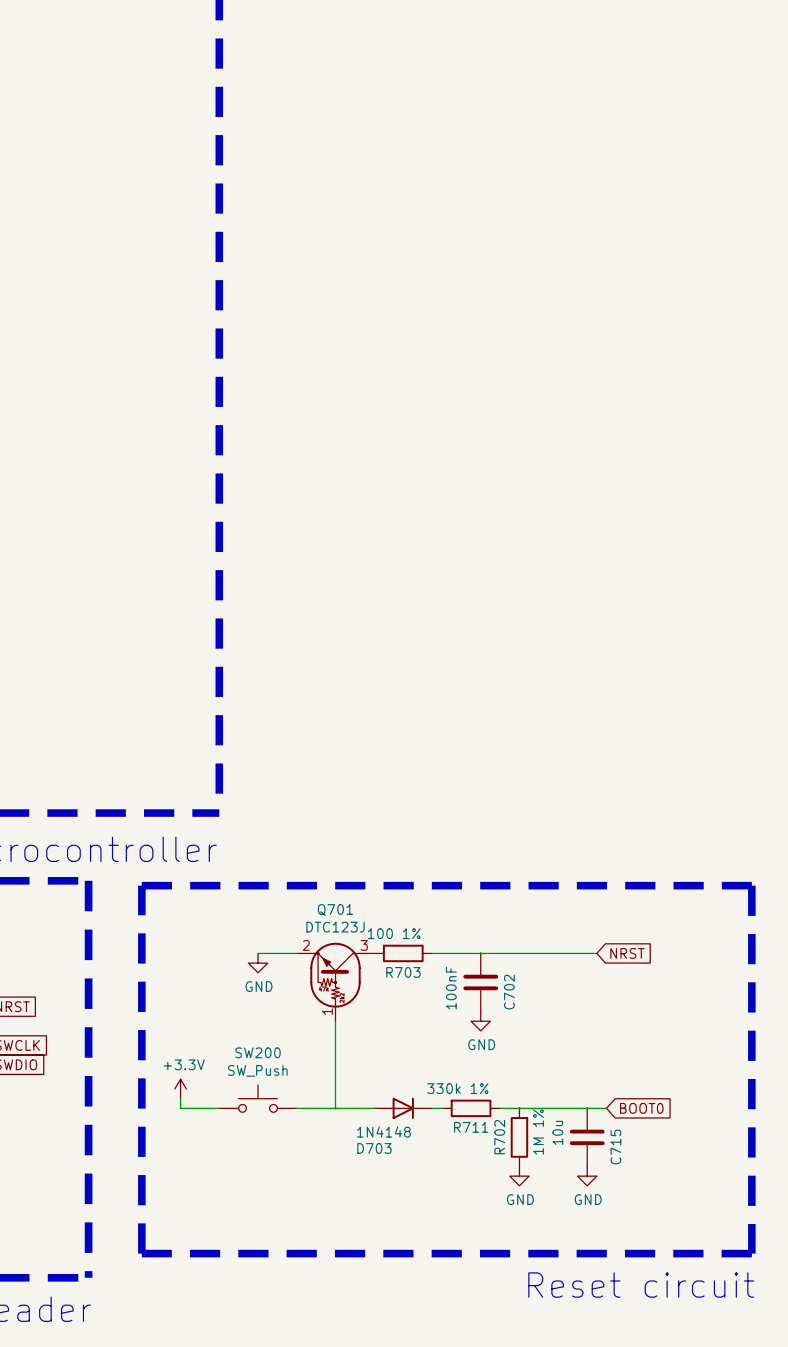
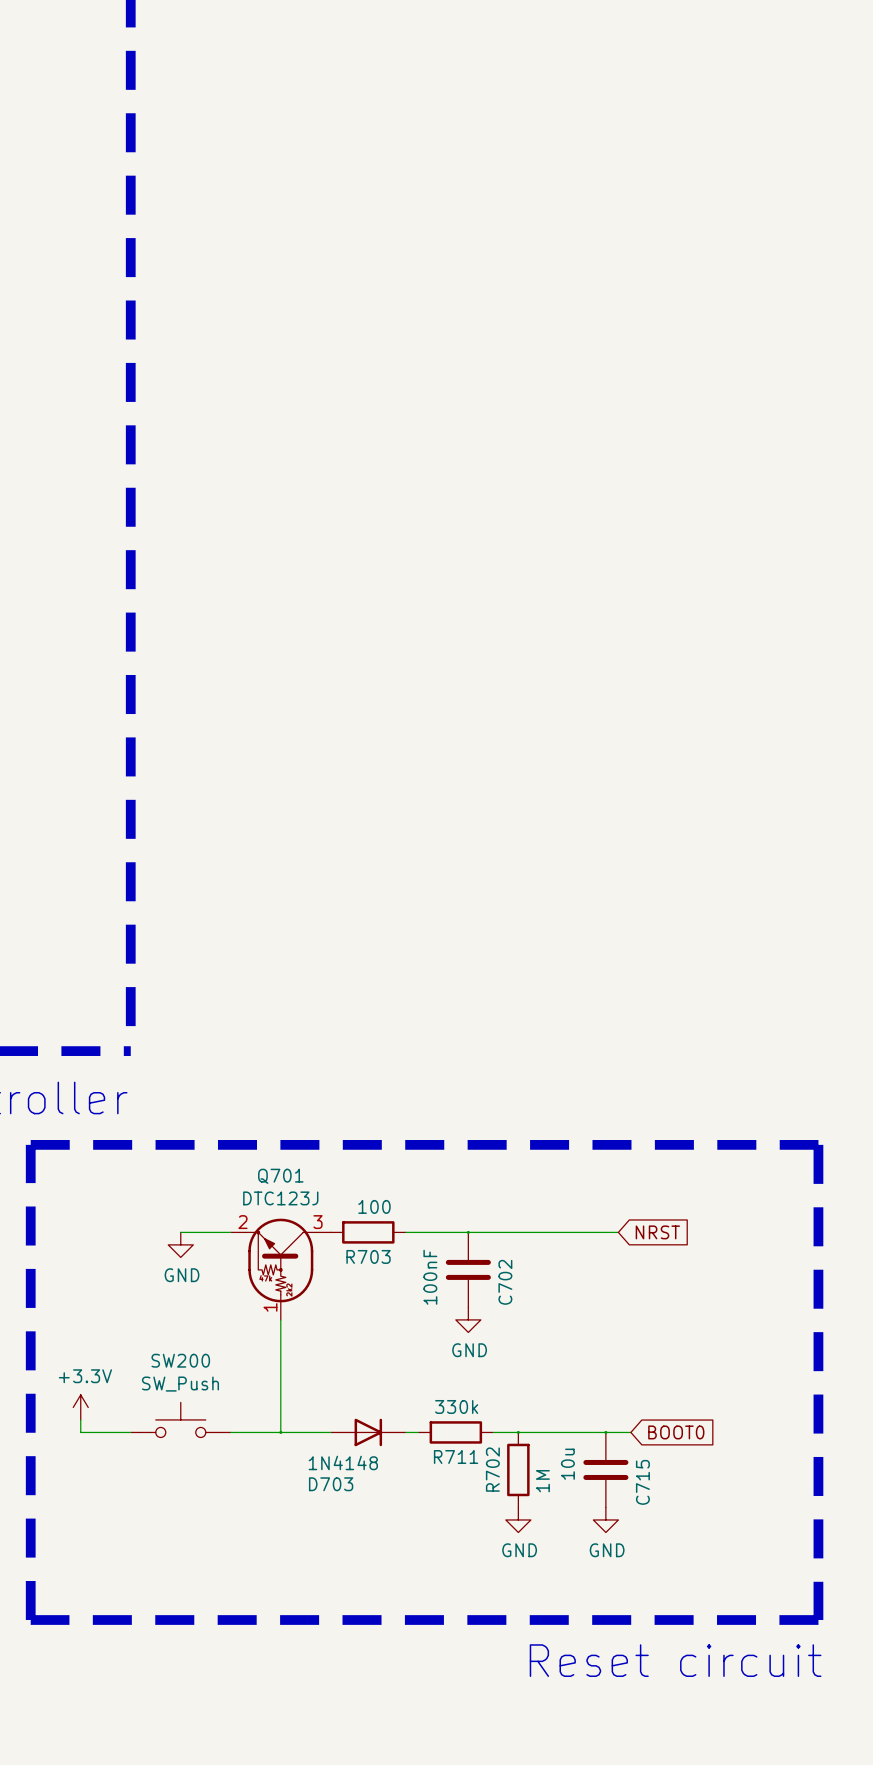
R703 value: 100 1% (394, 933) -> 100 (374, 1206)
R711 value: 330k 1% (457, 1088) -> 330k (456, 1406)
R702 value: 1M 1% (538, 1132) -> 1M (542, 1481)

